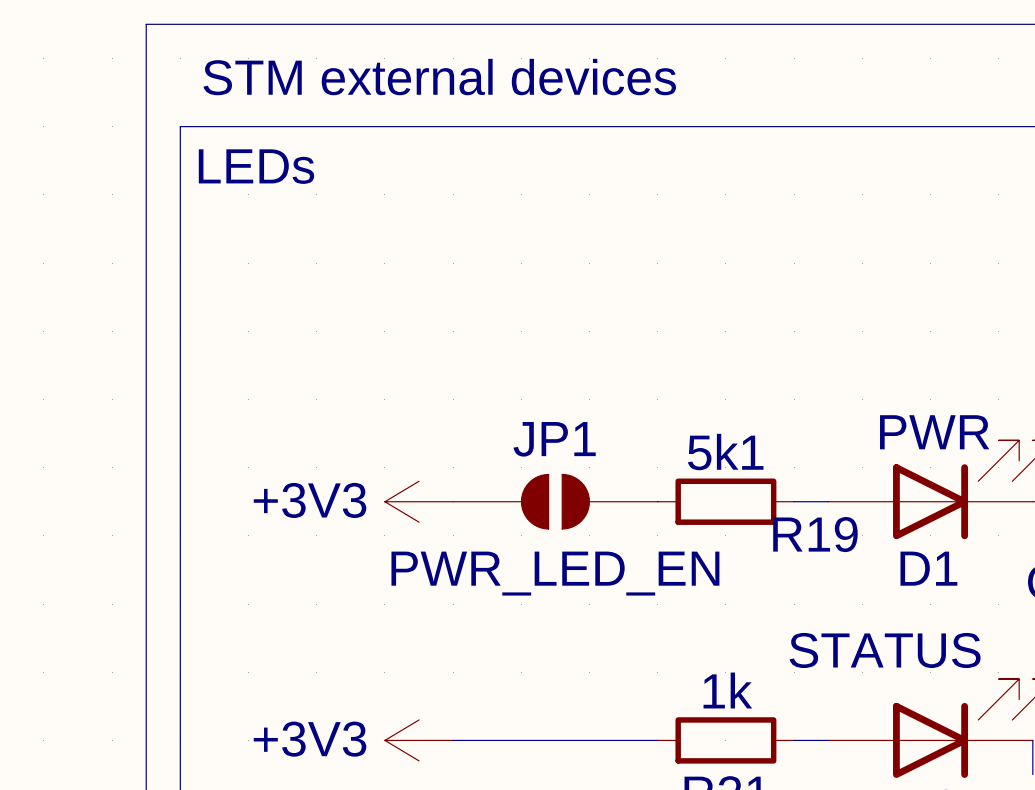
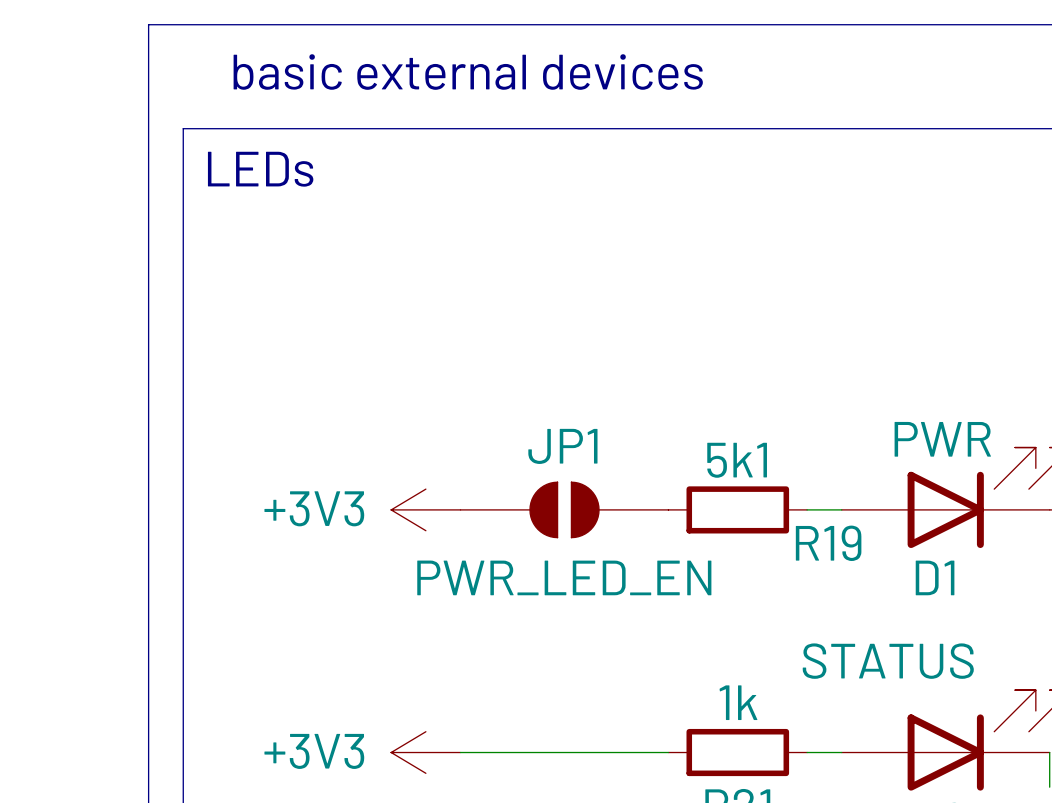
text: STM external devices (439, 77) -> basic external devices (468, 72)

